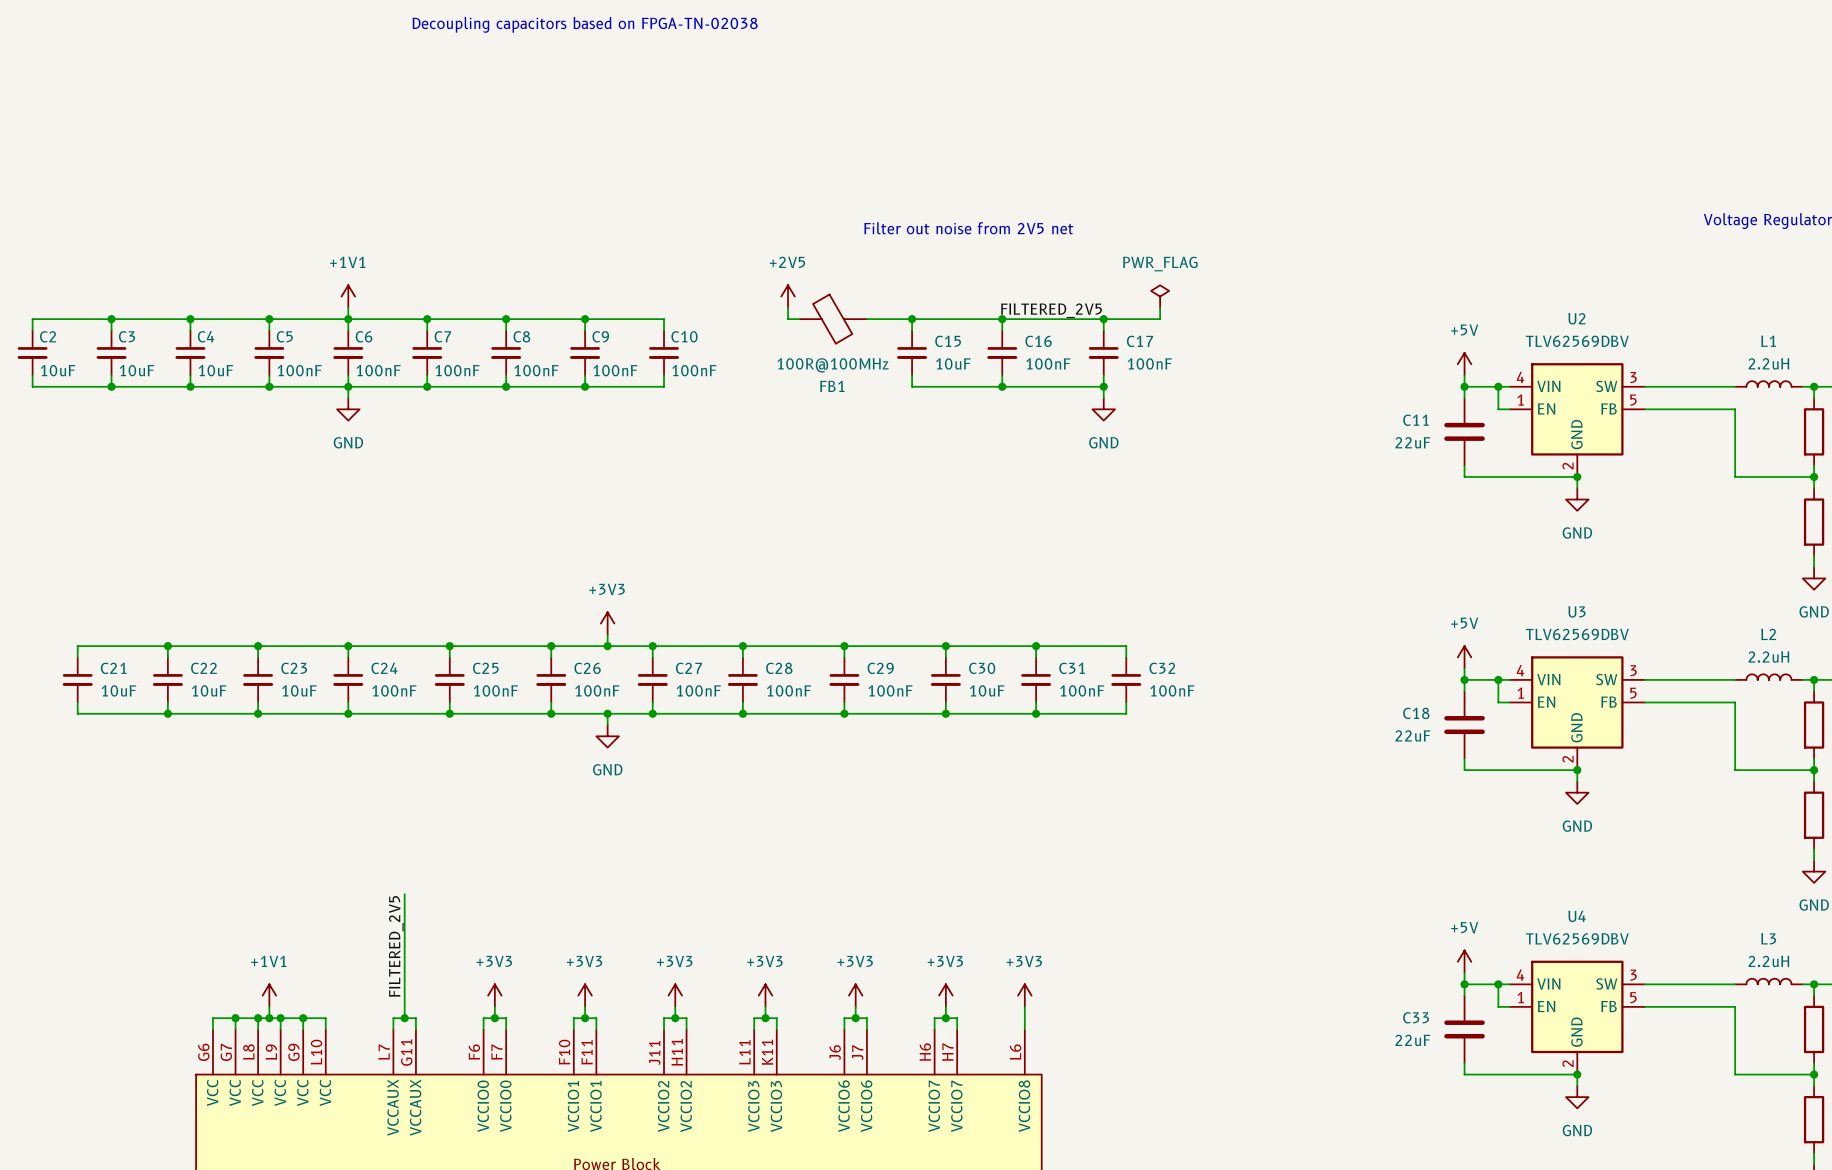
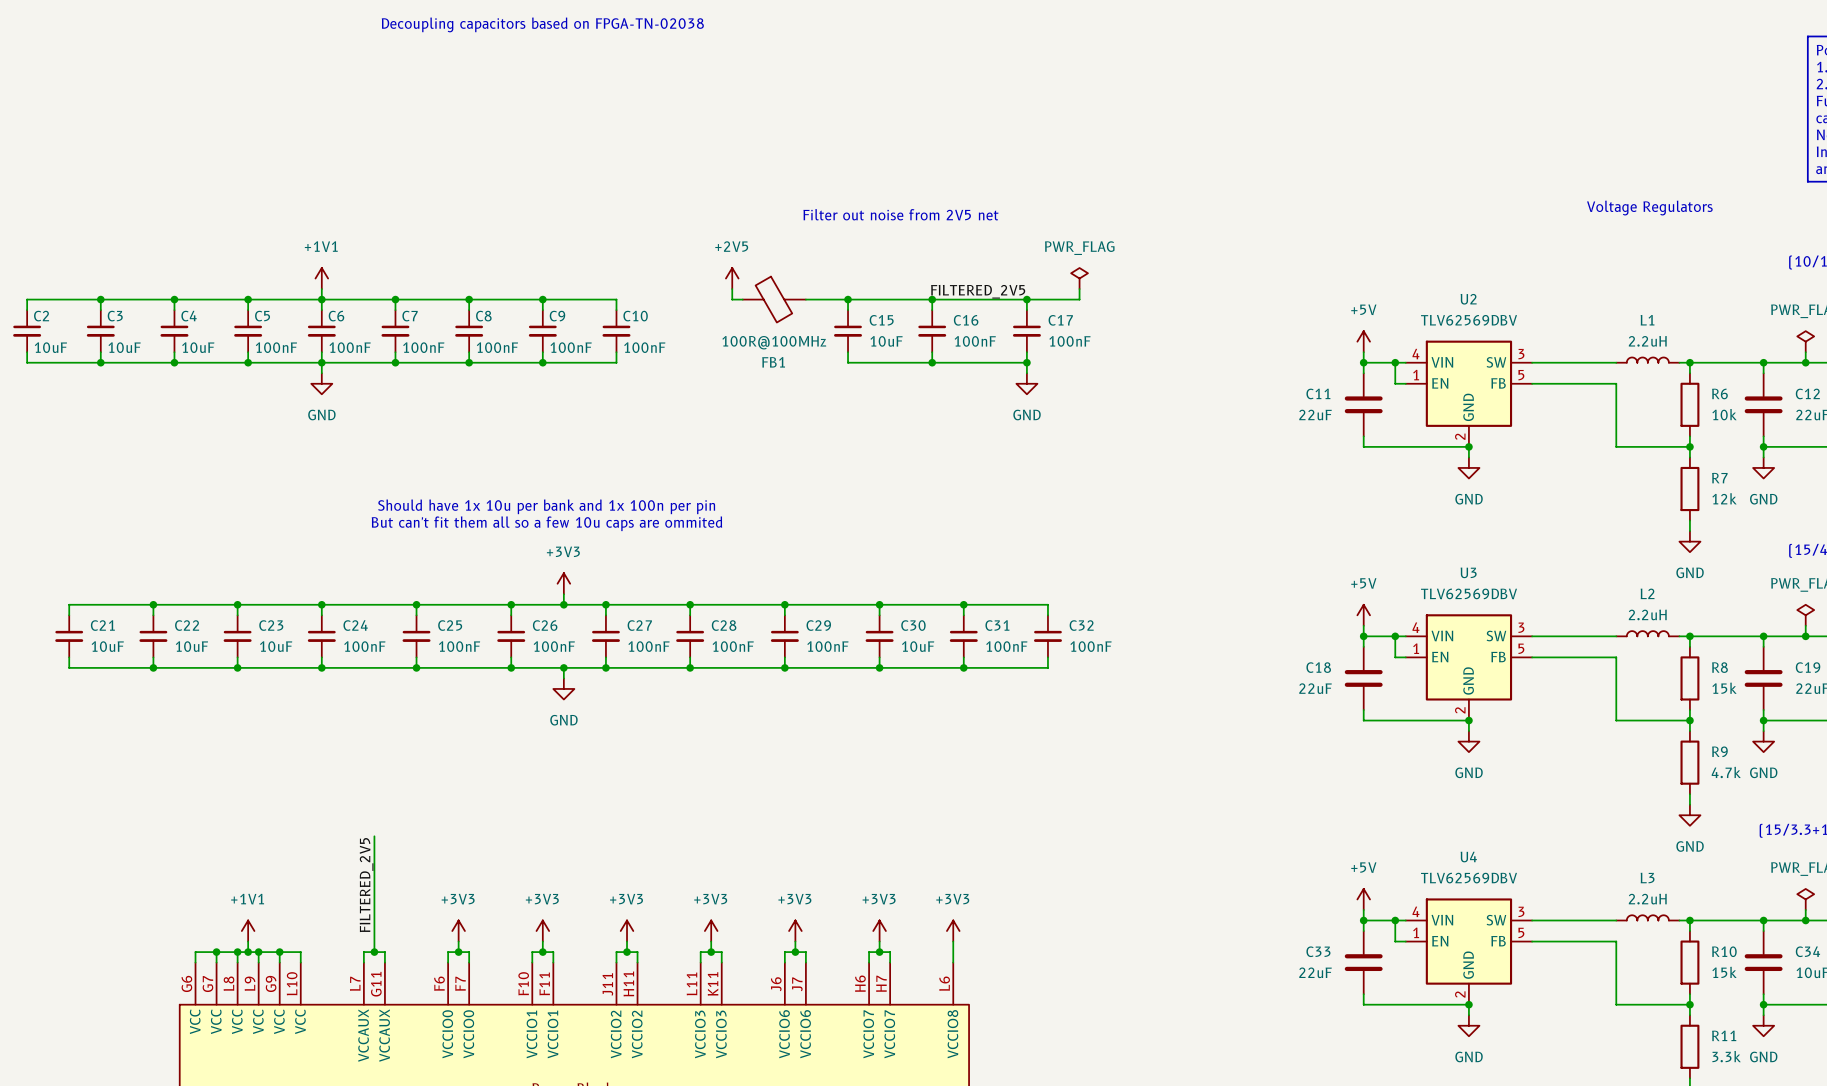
text: none -> Should have 1x 10u per bank and 1x 100n per pin (546, 506)
text: none -> But can't fit them all so a few 10u caps are ommited (546, 523)

